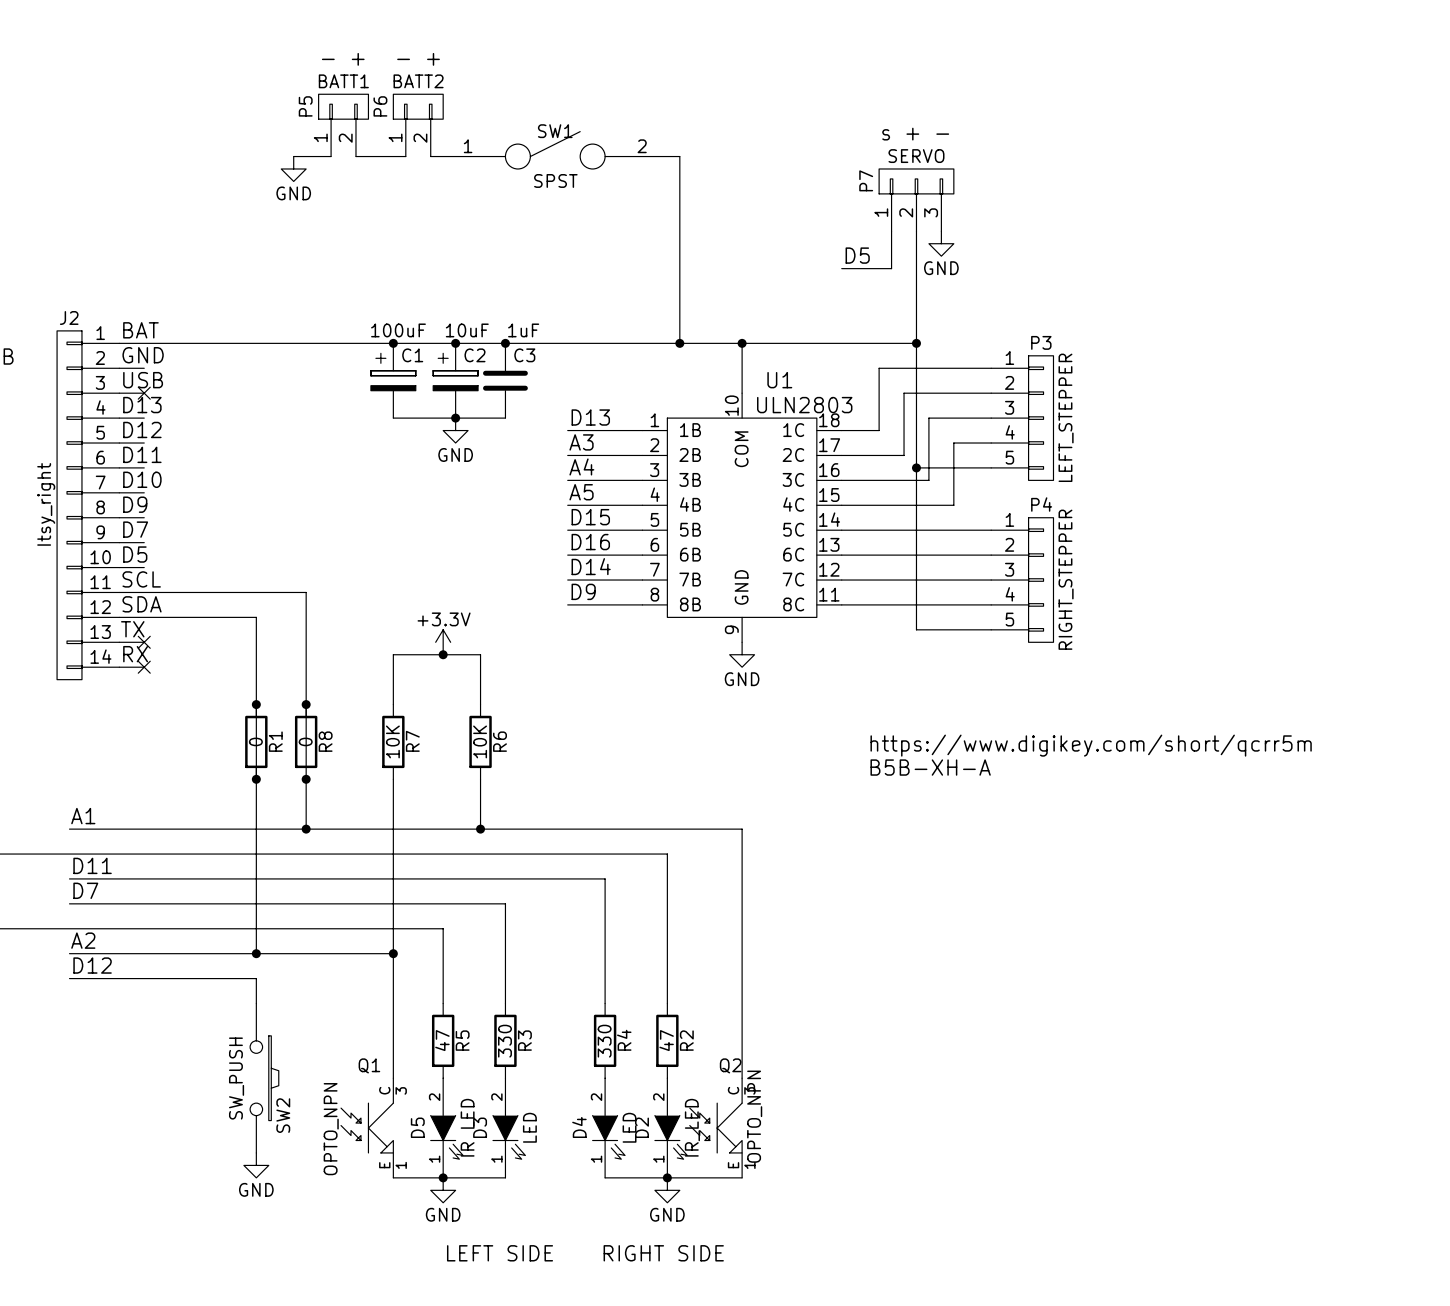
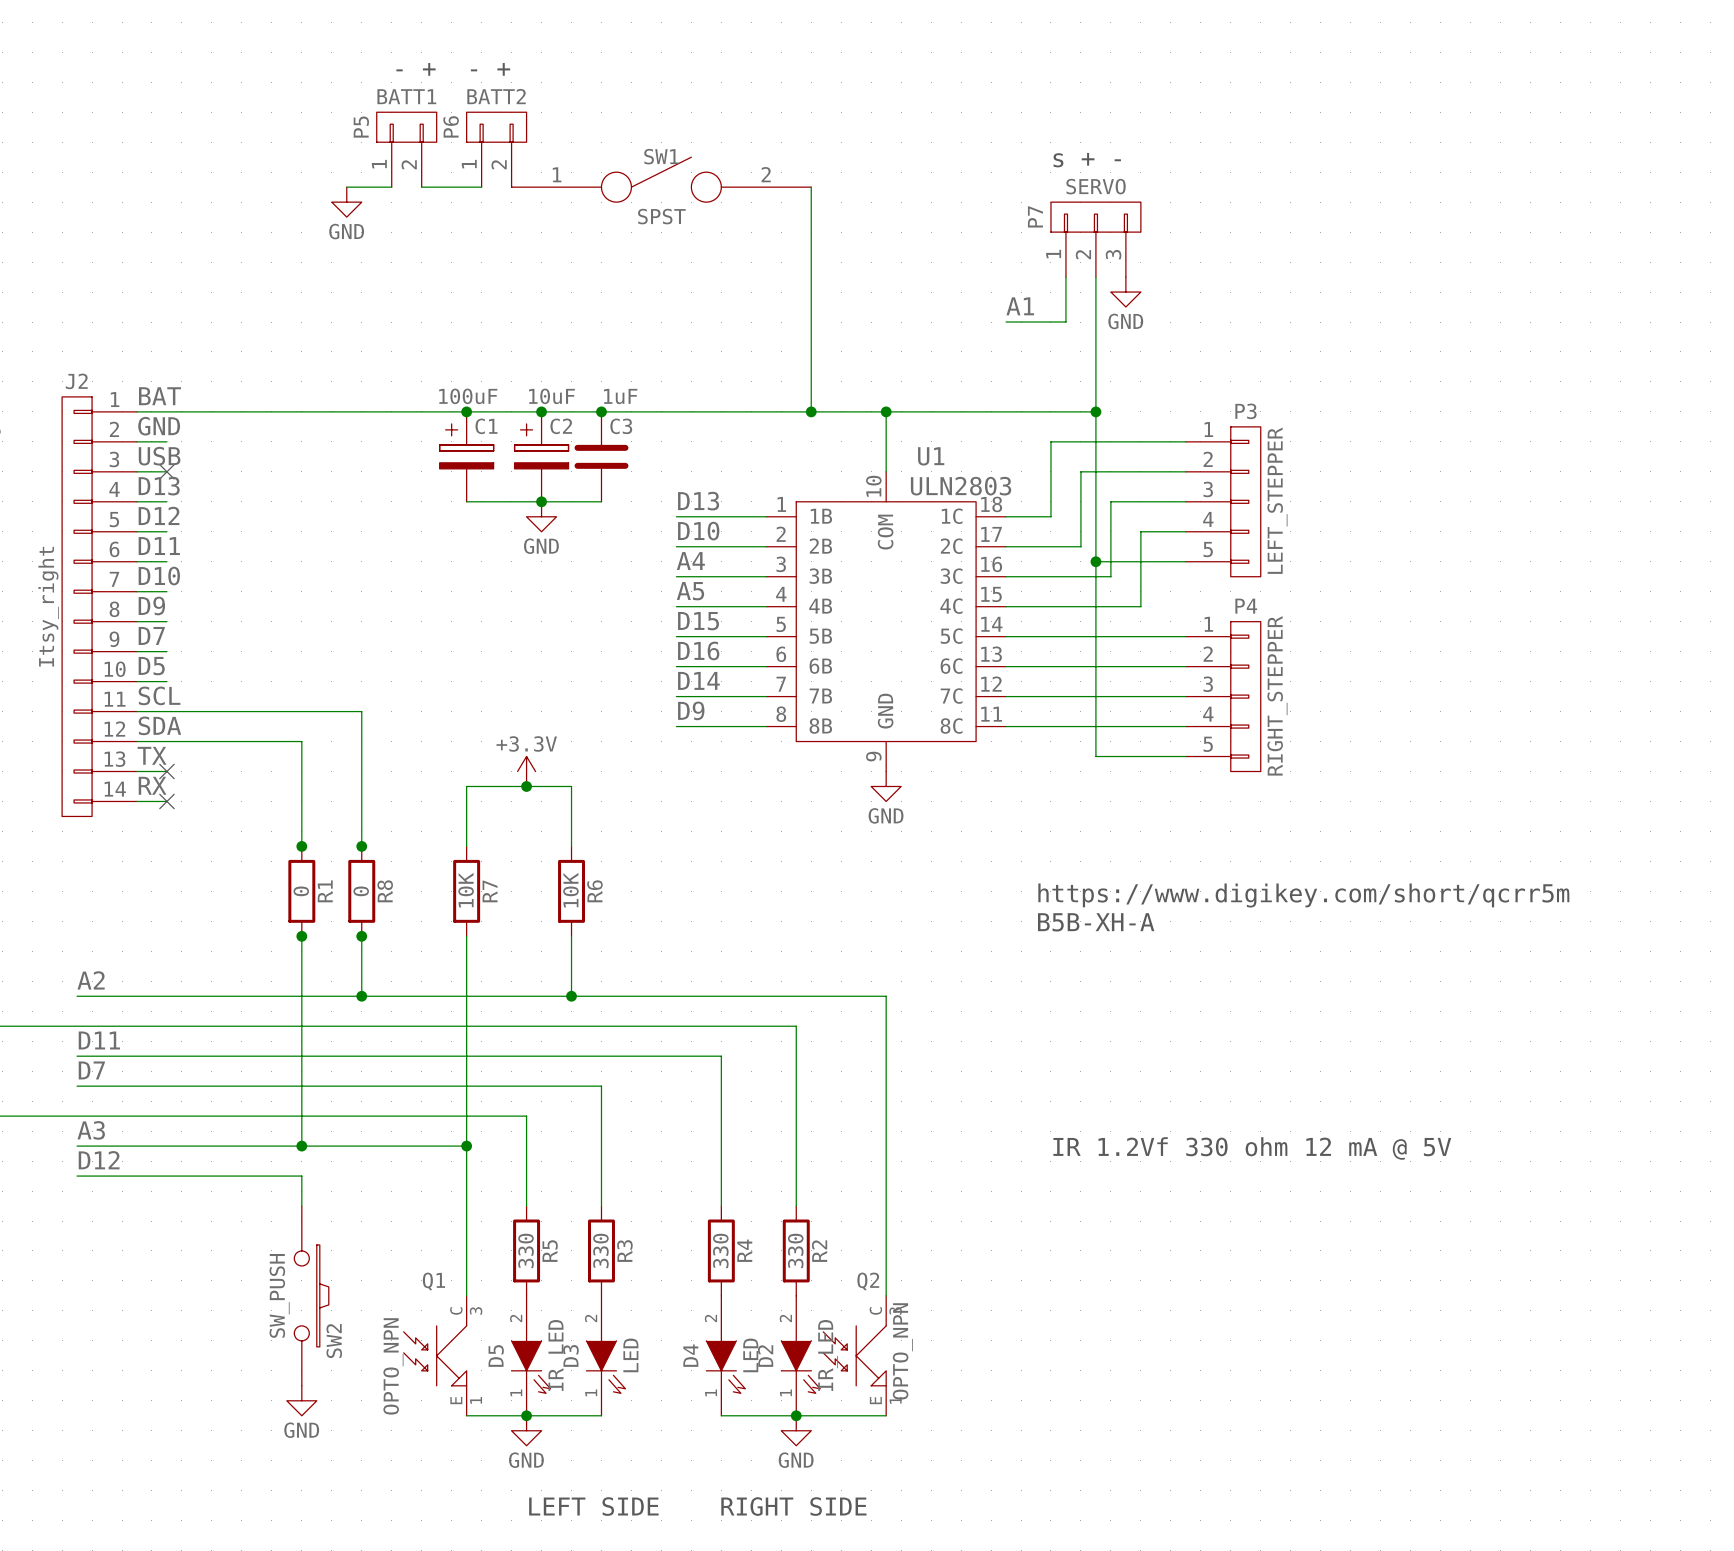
label: D5 (857, 255) -> A1 (1020, 306)
label: A3 (581, 442) -> D10 (698, 531)
wire: (256, 704) (256, 779) -> none
wire: (306, 704) (306, 766) -> none
label: A1 (83, 816) -> A2 (91, 980)
label: A2 (83, 940) -> A3 (91, 1130)
text: none -> IR 1.2Vf 330 ohm 12 mA @ 5V (1252, 1148)
R5 value: 47 (442, 1040) -> 330 (526, 1250)
R2 value: 47 (666, 1040) -> 330 (795, 1250)

